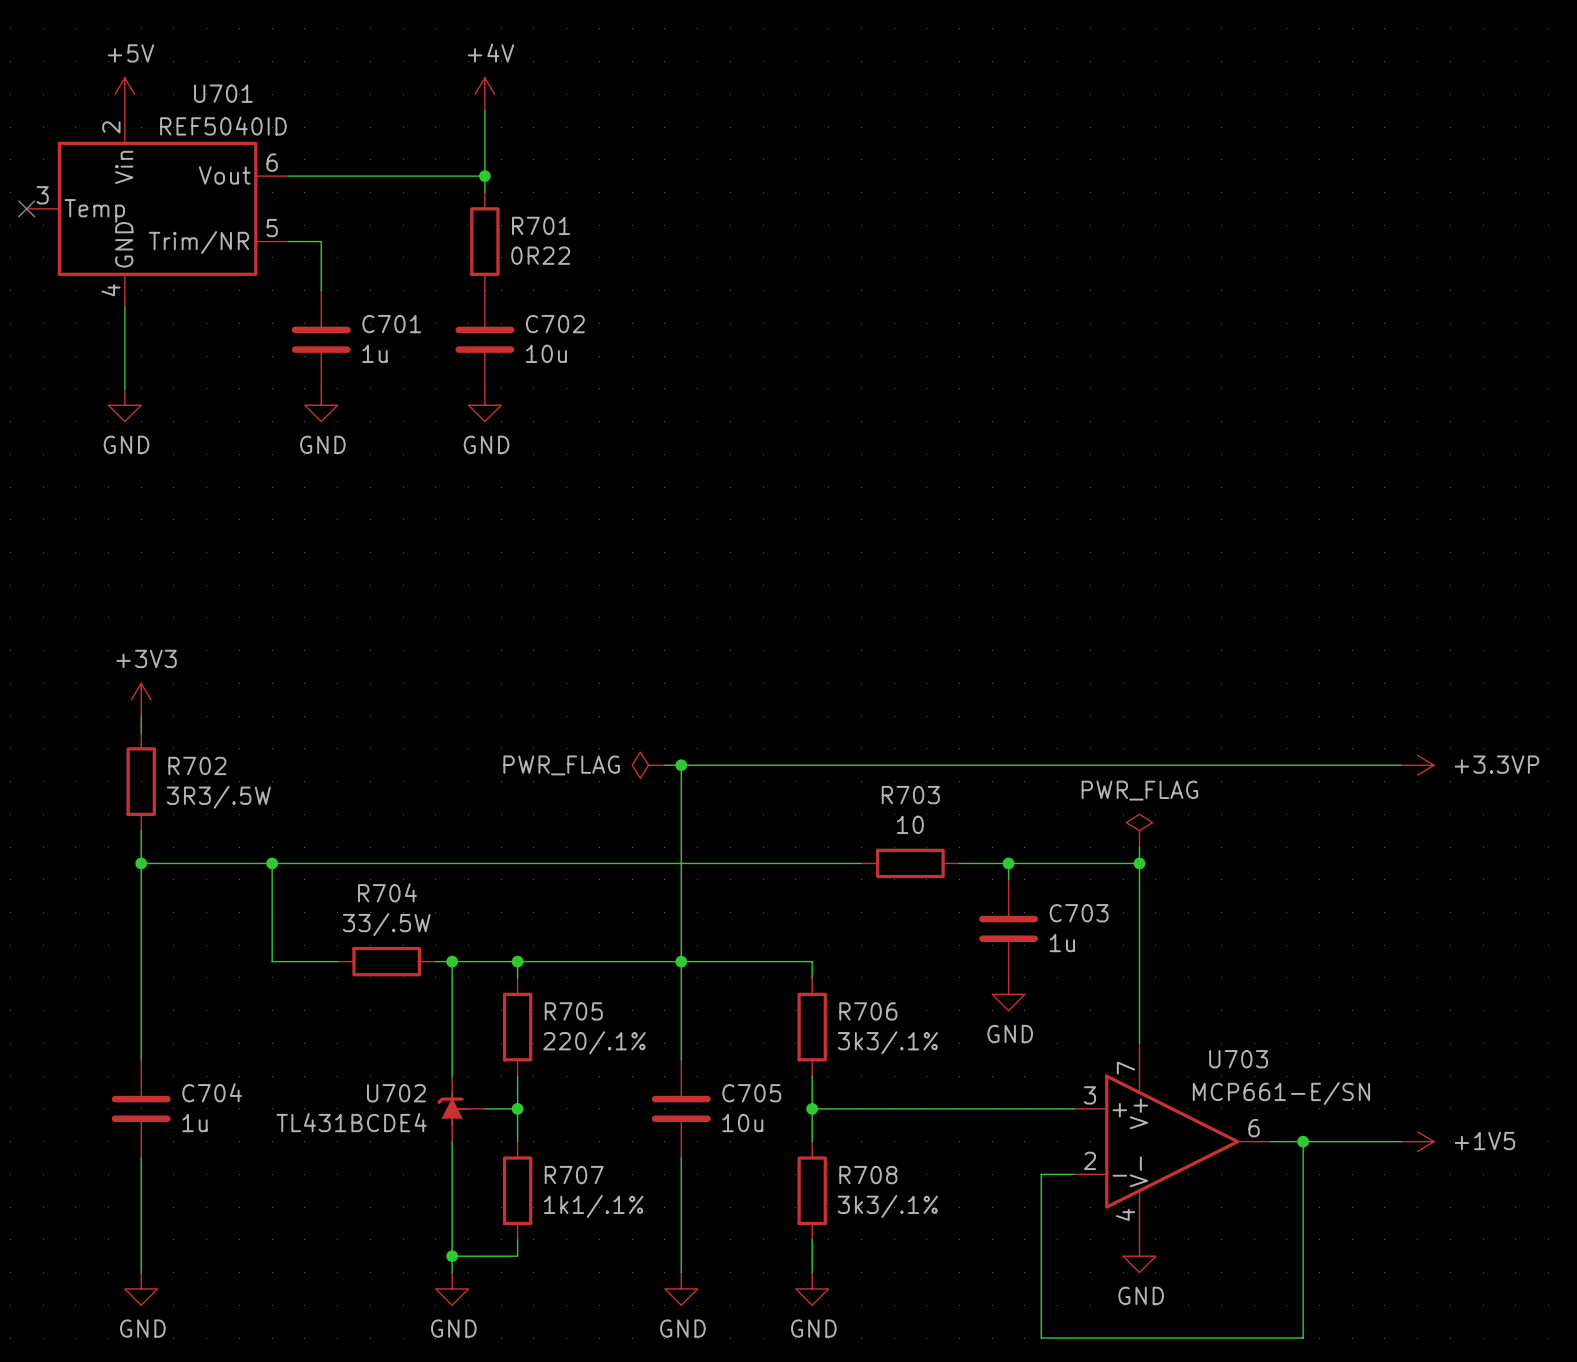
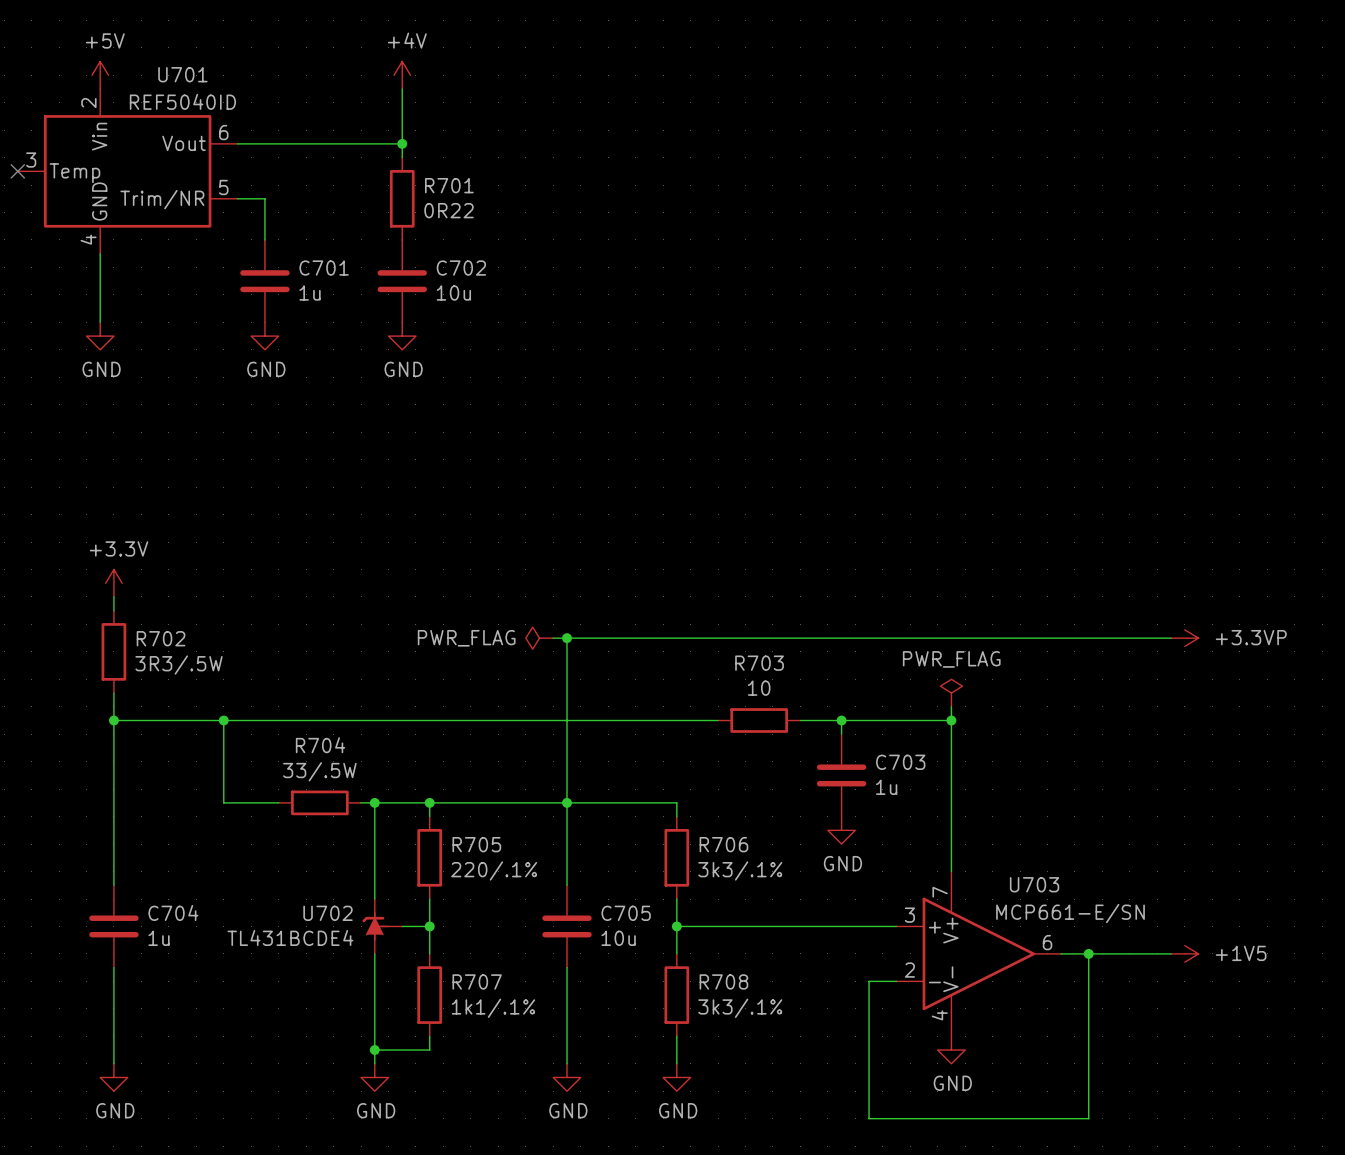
power symbol: +3V3 (141, 699) -> +3.3V (113, 583)

